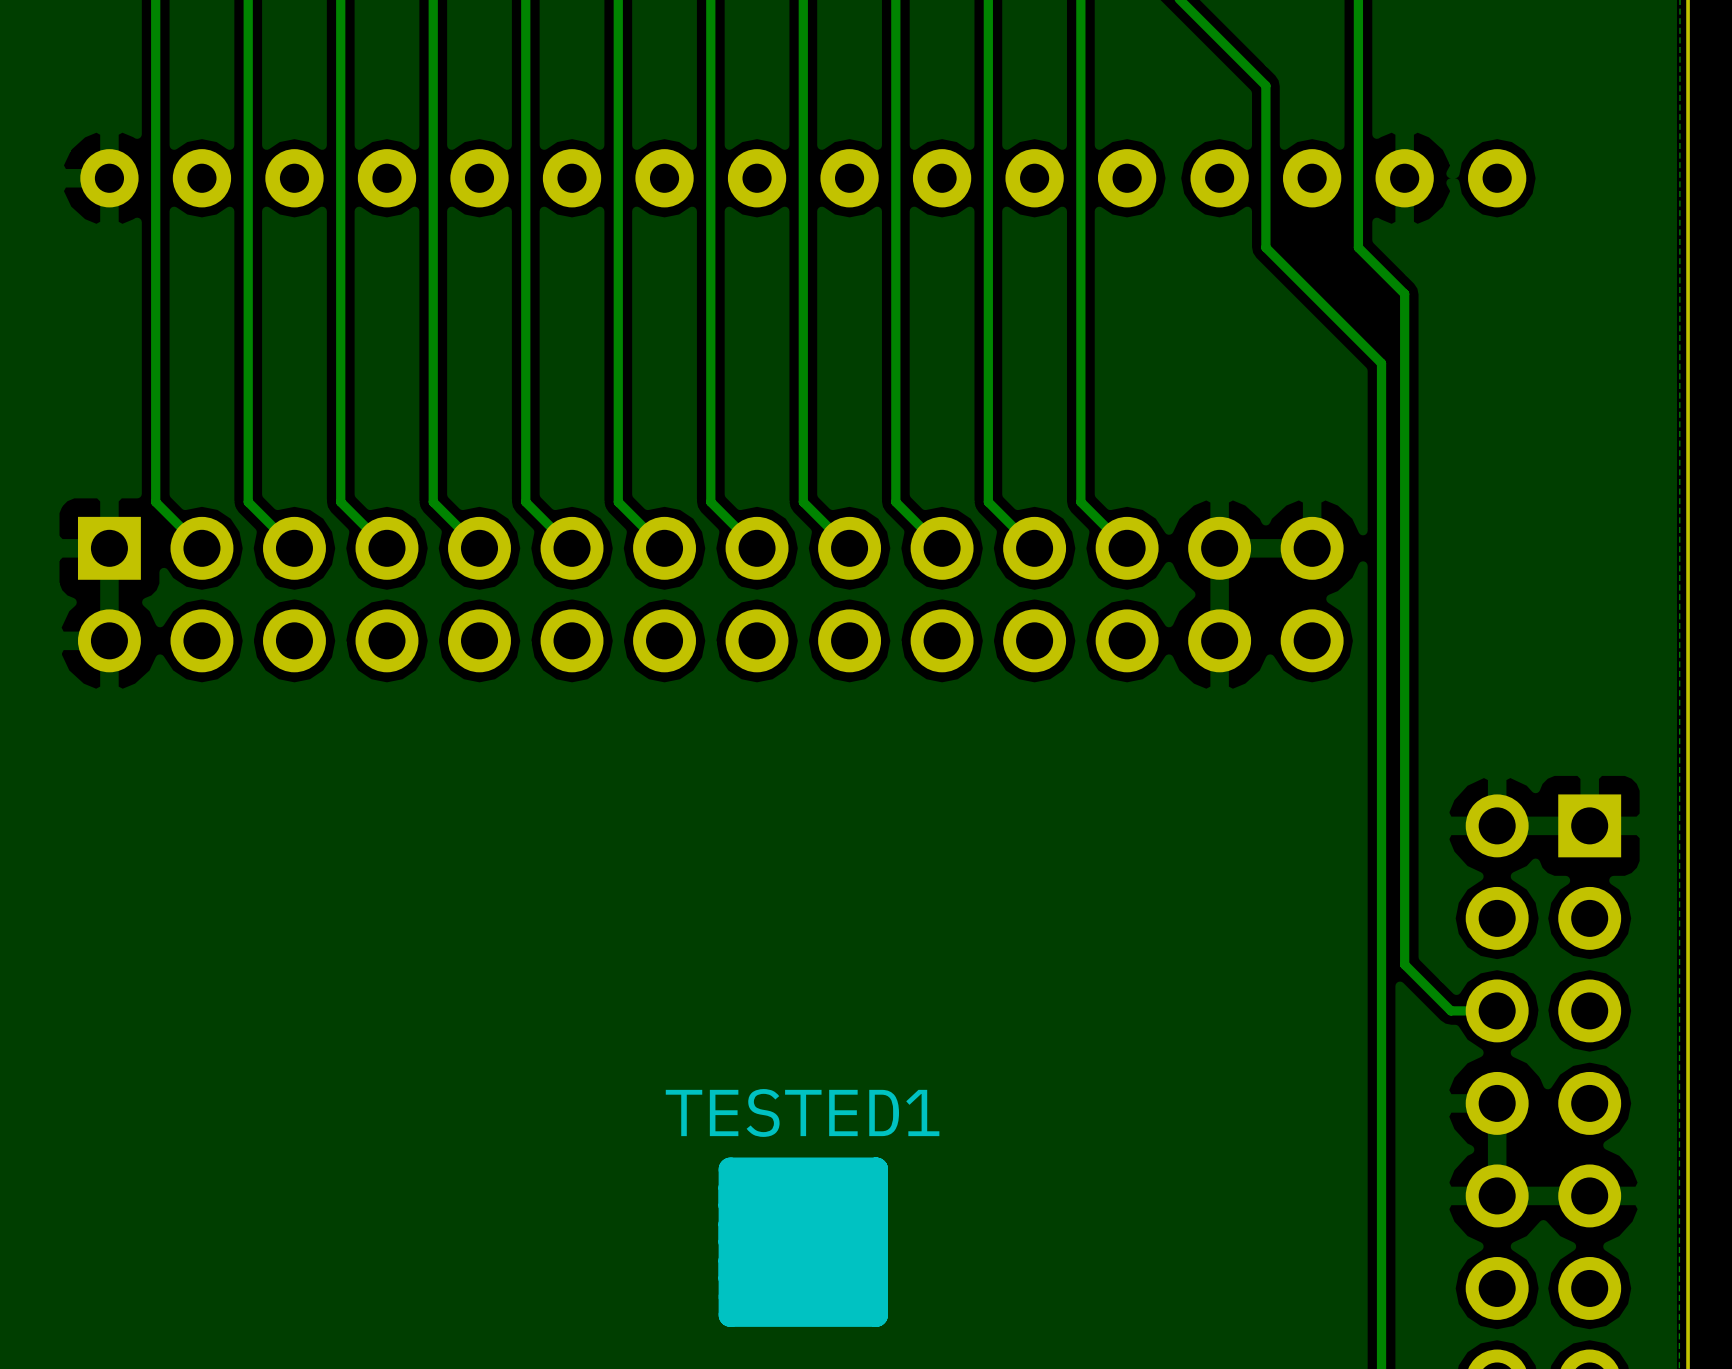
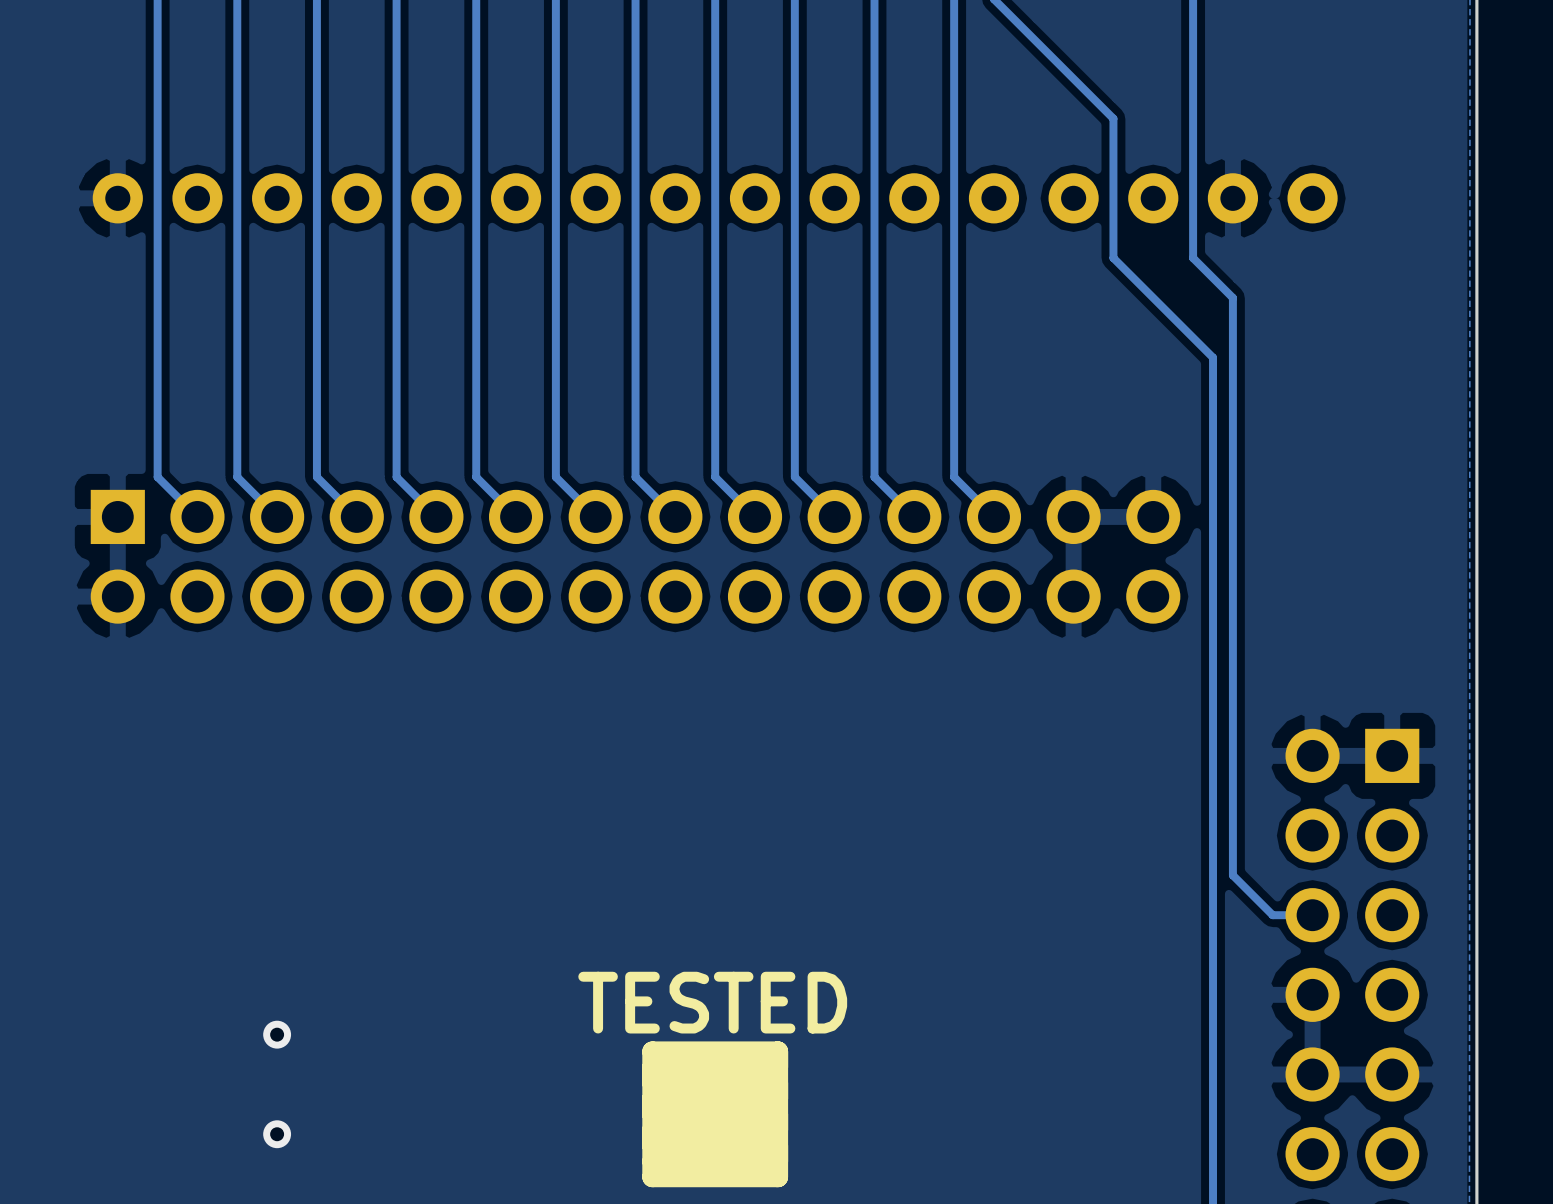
TESTED1 name: TESTED1 (802, 1112) -> TESTED (712, 1002)
via: none -> (277, 1034)
via: none -> (277, 1134)

